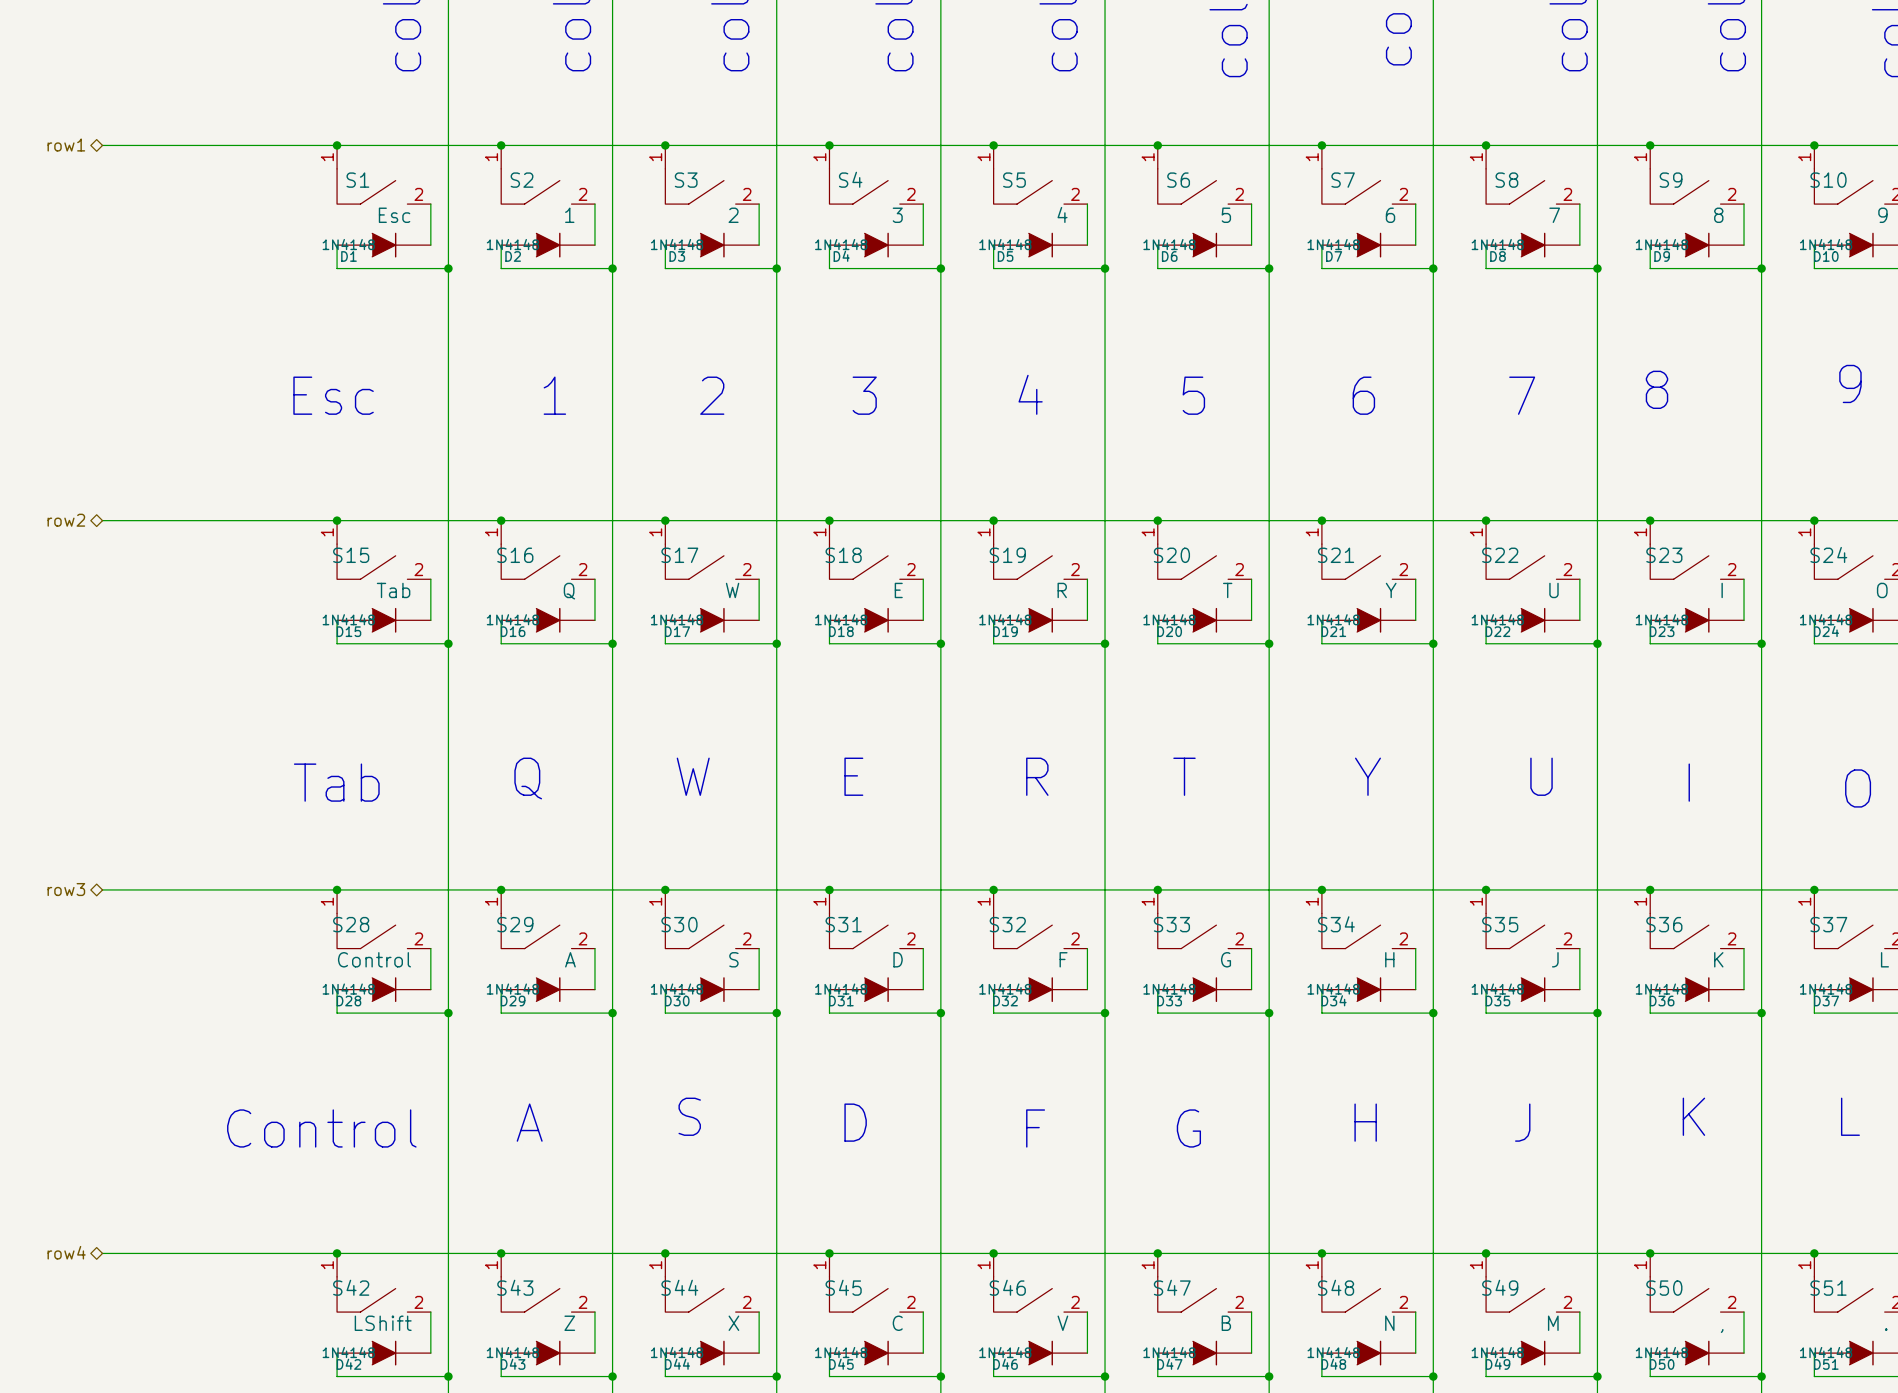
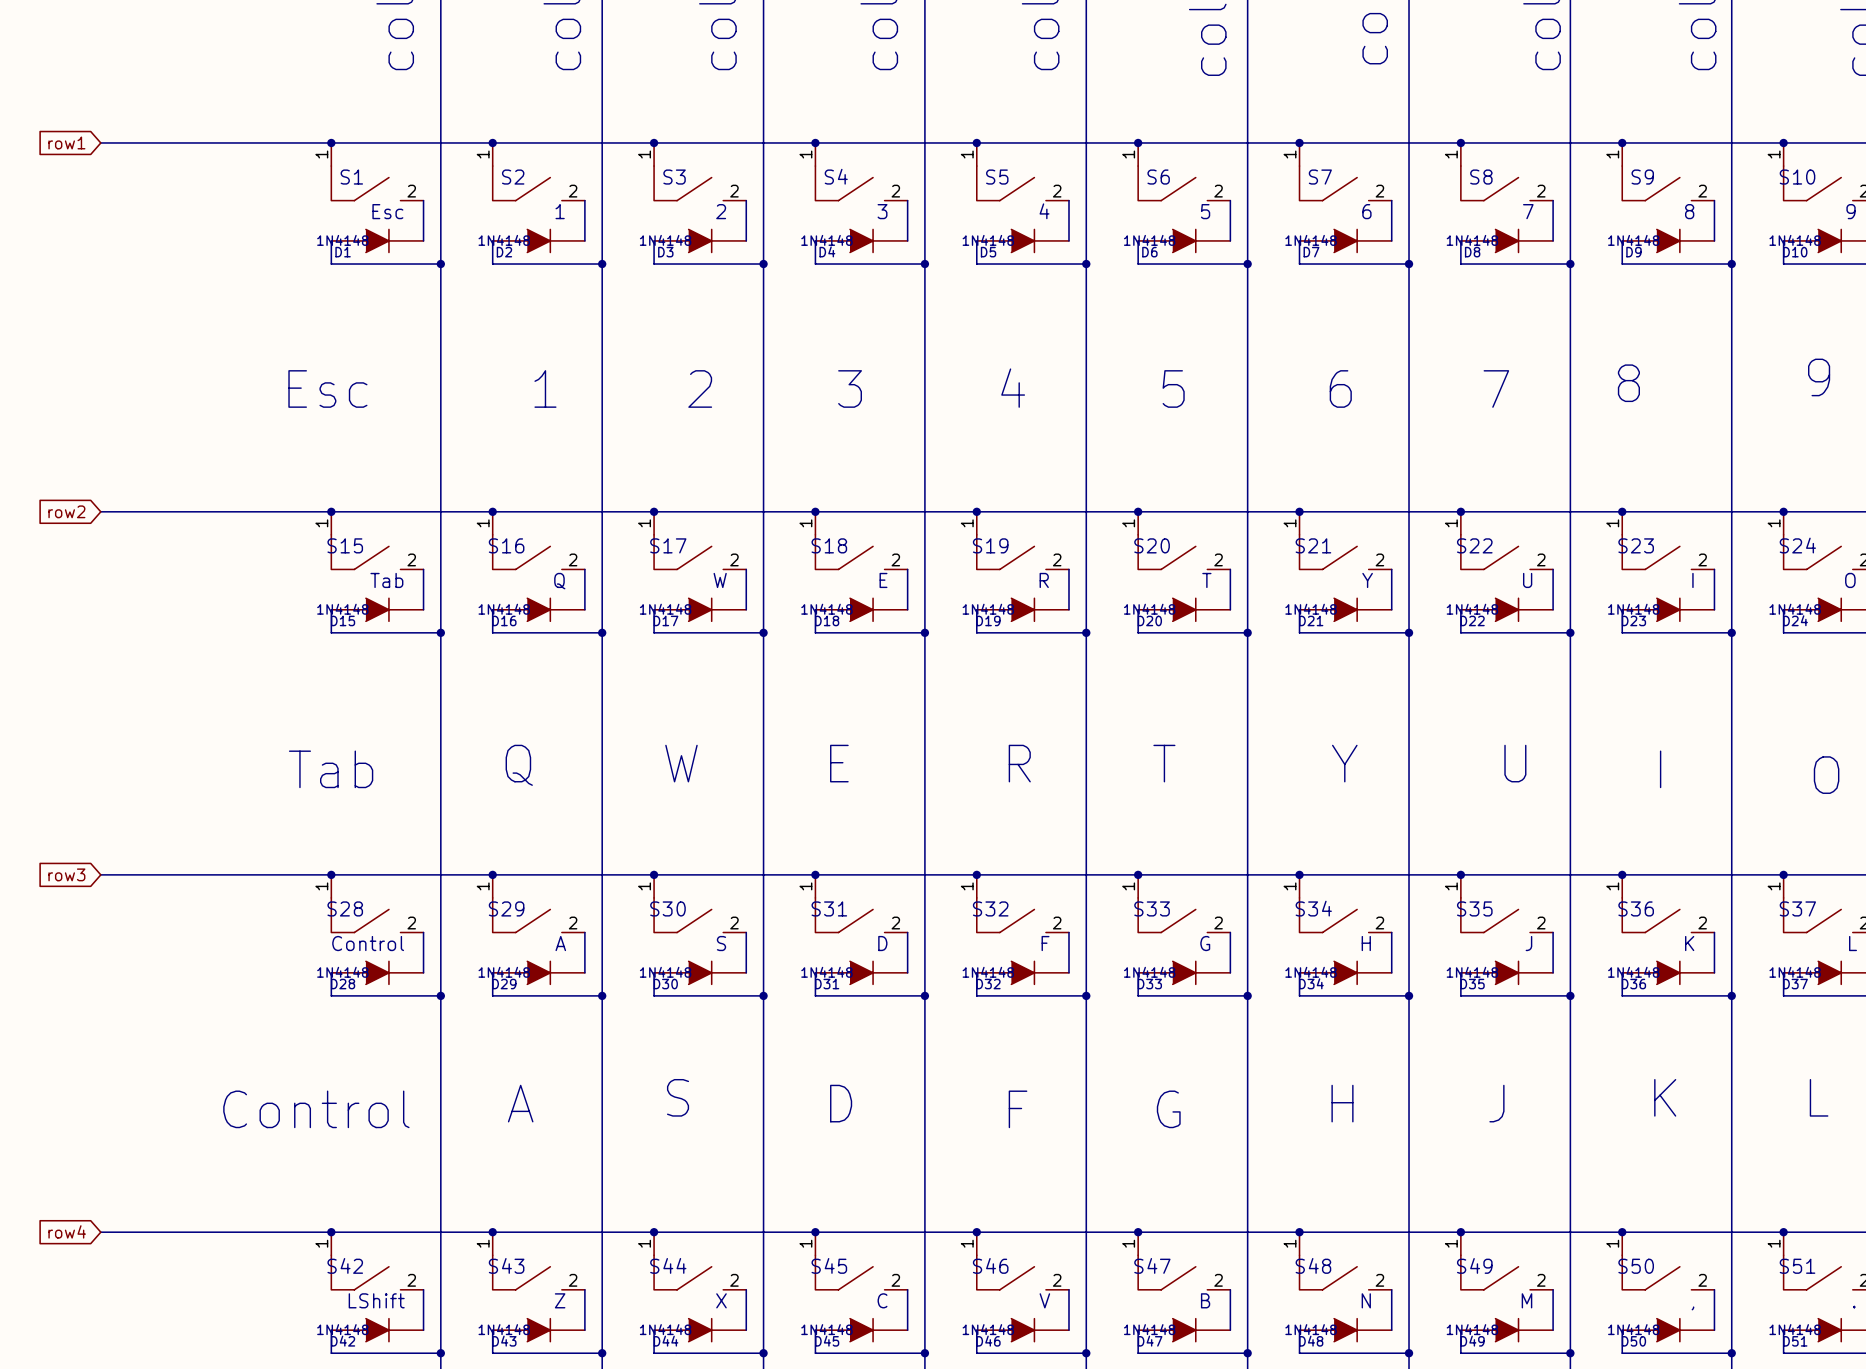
hierarchical label: row1 (66, 145) -> none
global label: none -> row1 (66, 142)
hierarchical label: row2 (66, 520) -> none
global label: none -> row2 (66, 511)
hierarchical label: row3 (66, 889) -> none
global label: none -> row3 (66, 874)
hierarchical label: row4 (66, 1252) -> none
global label: none -> row4 (67, 1231)

